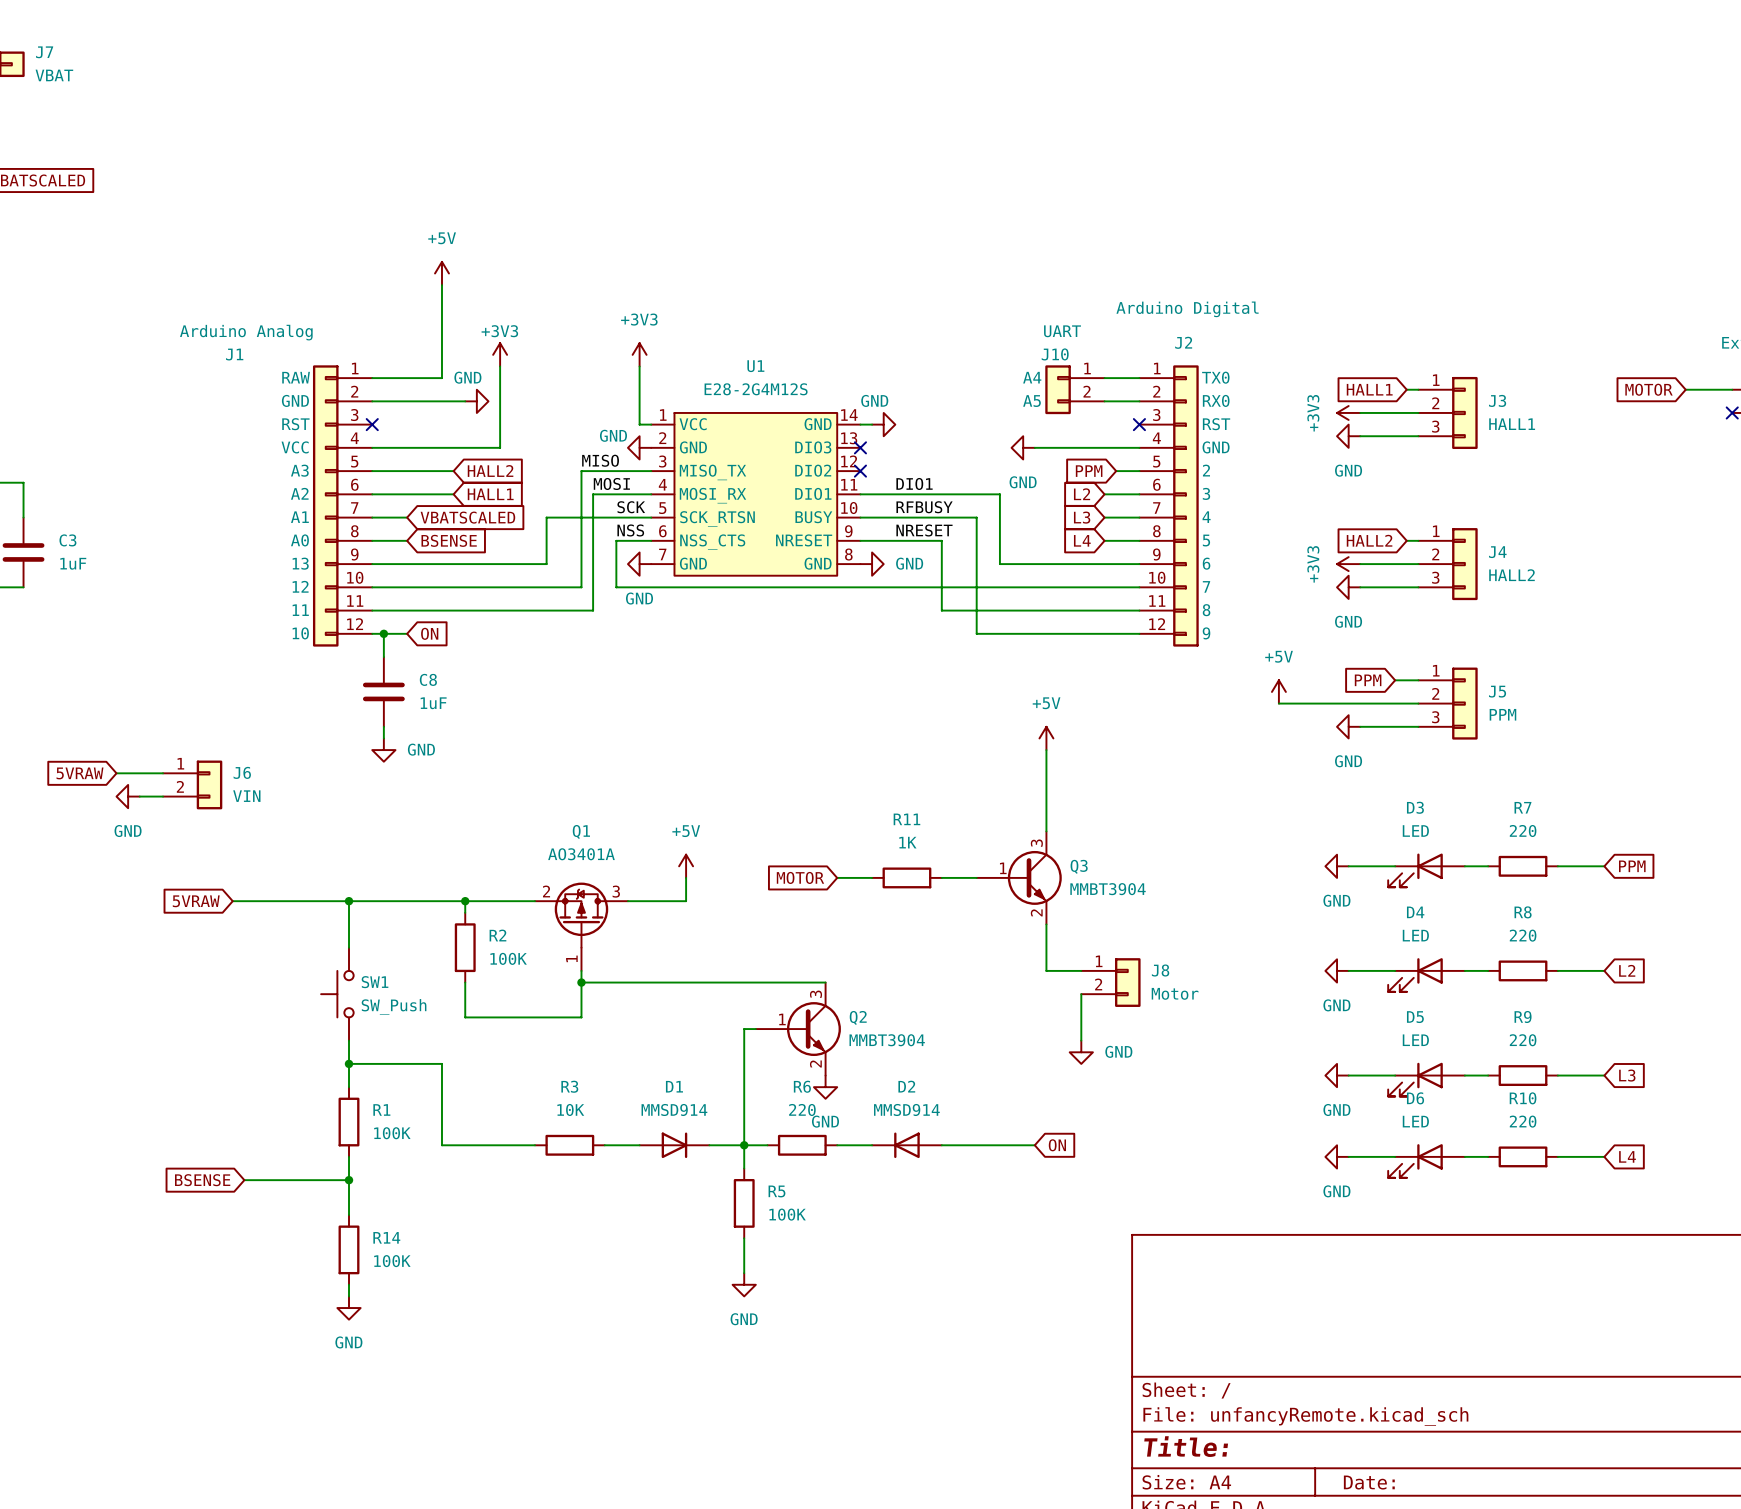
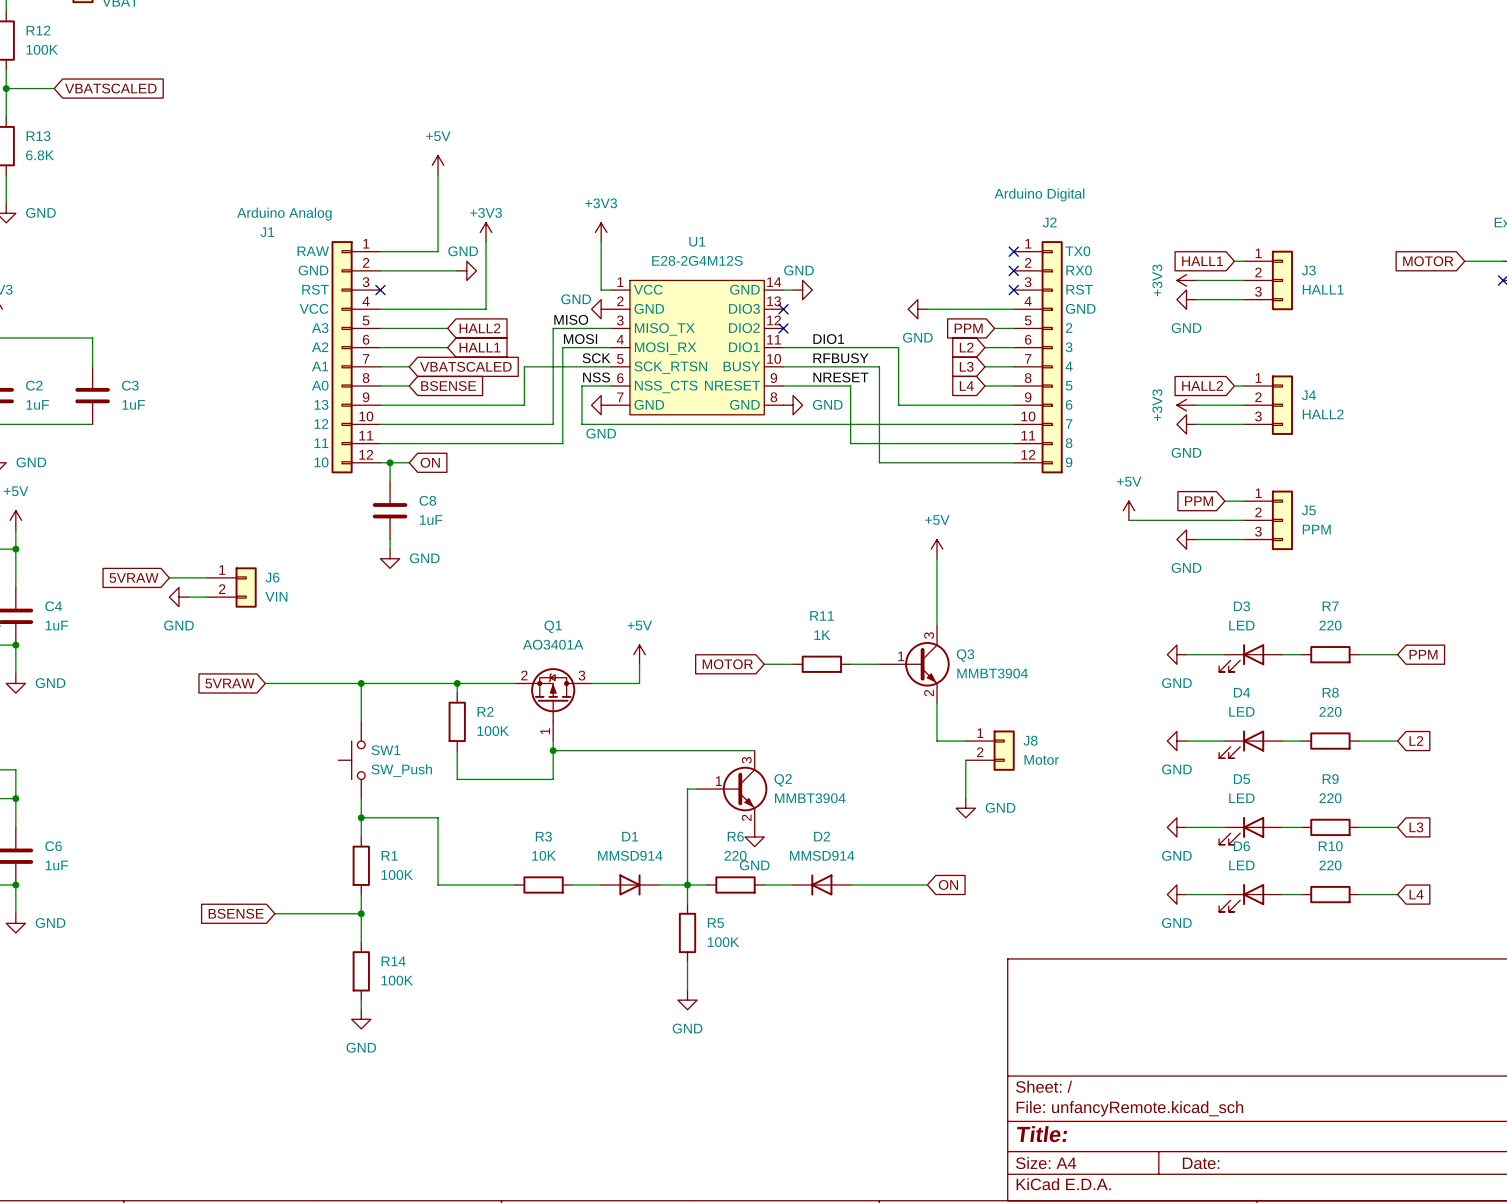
wire: (1104, 378) (1139, 378) -> none
no-connect mark: none -> (1013, 251)
J10: UART (1074, 389) -> none
wire: (1104, 401) (1139, 401) -> none
no-connect mark: none -> (1013, 270)

